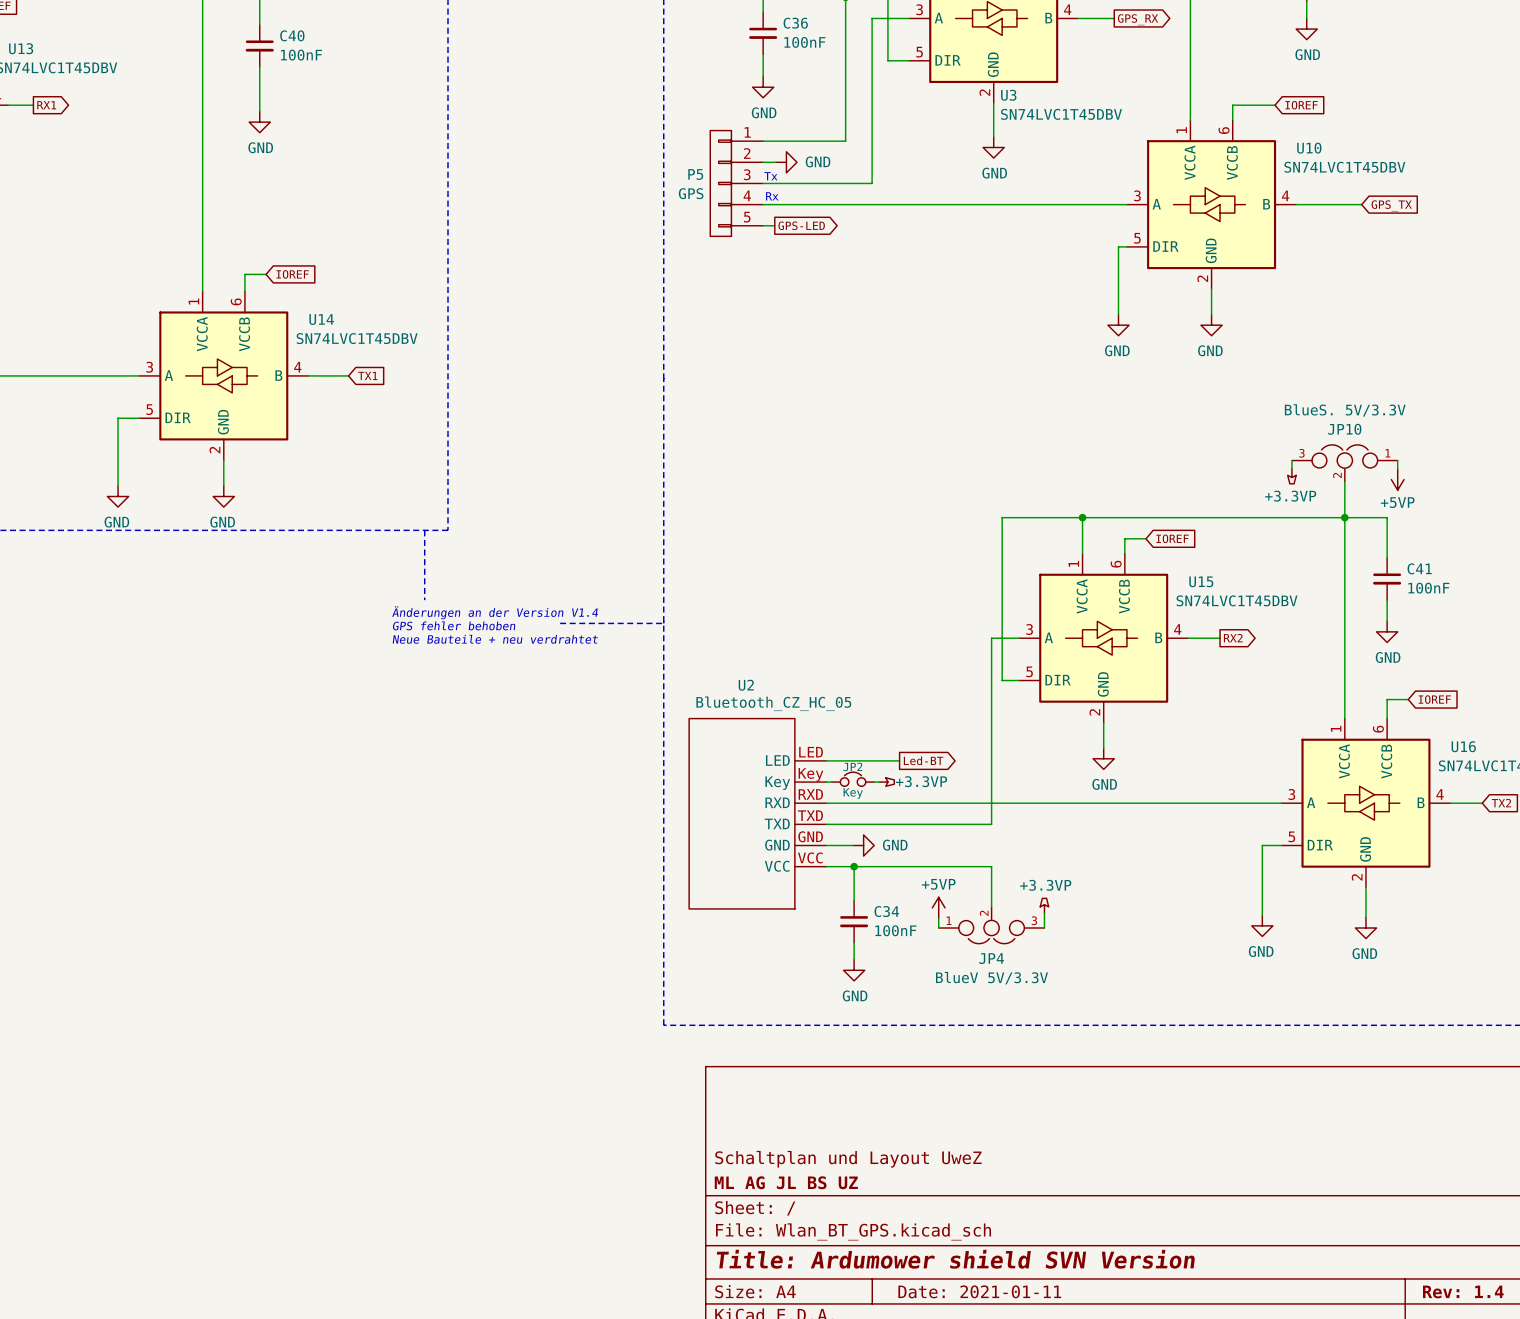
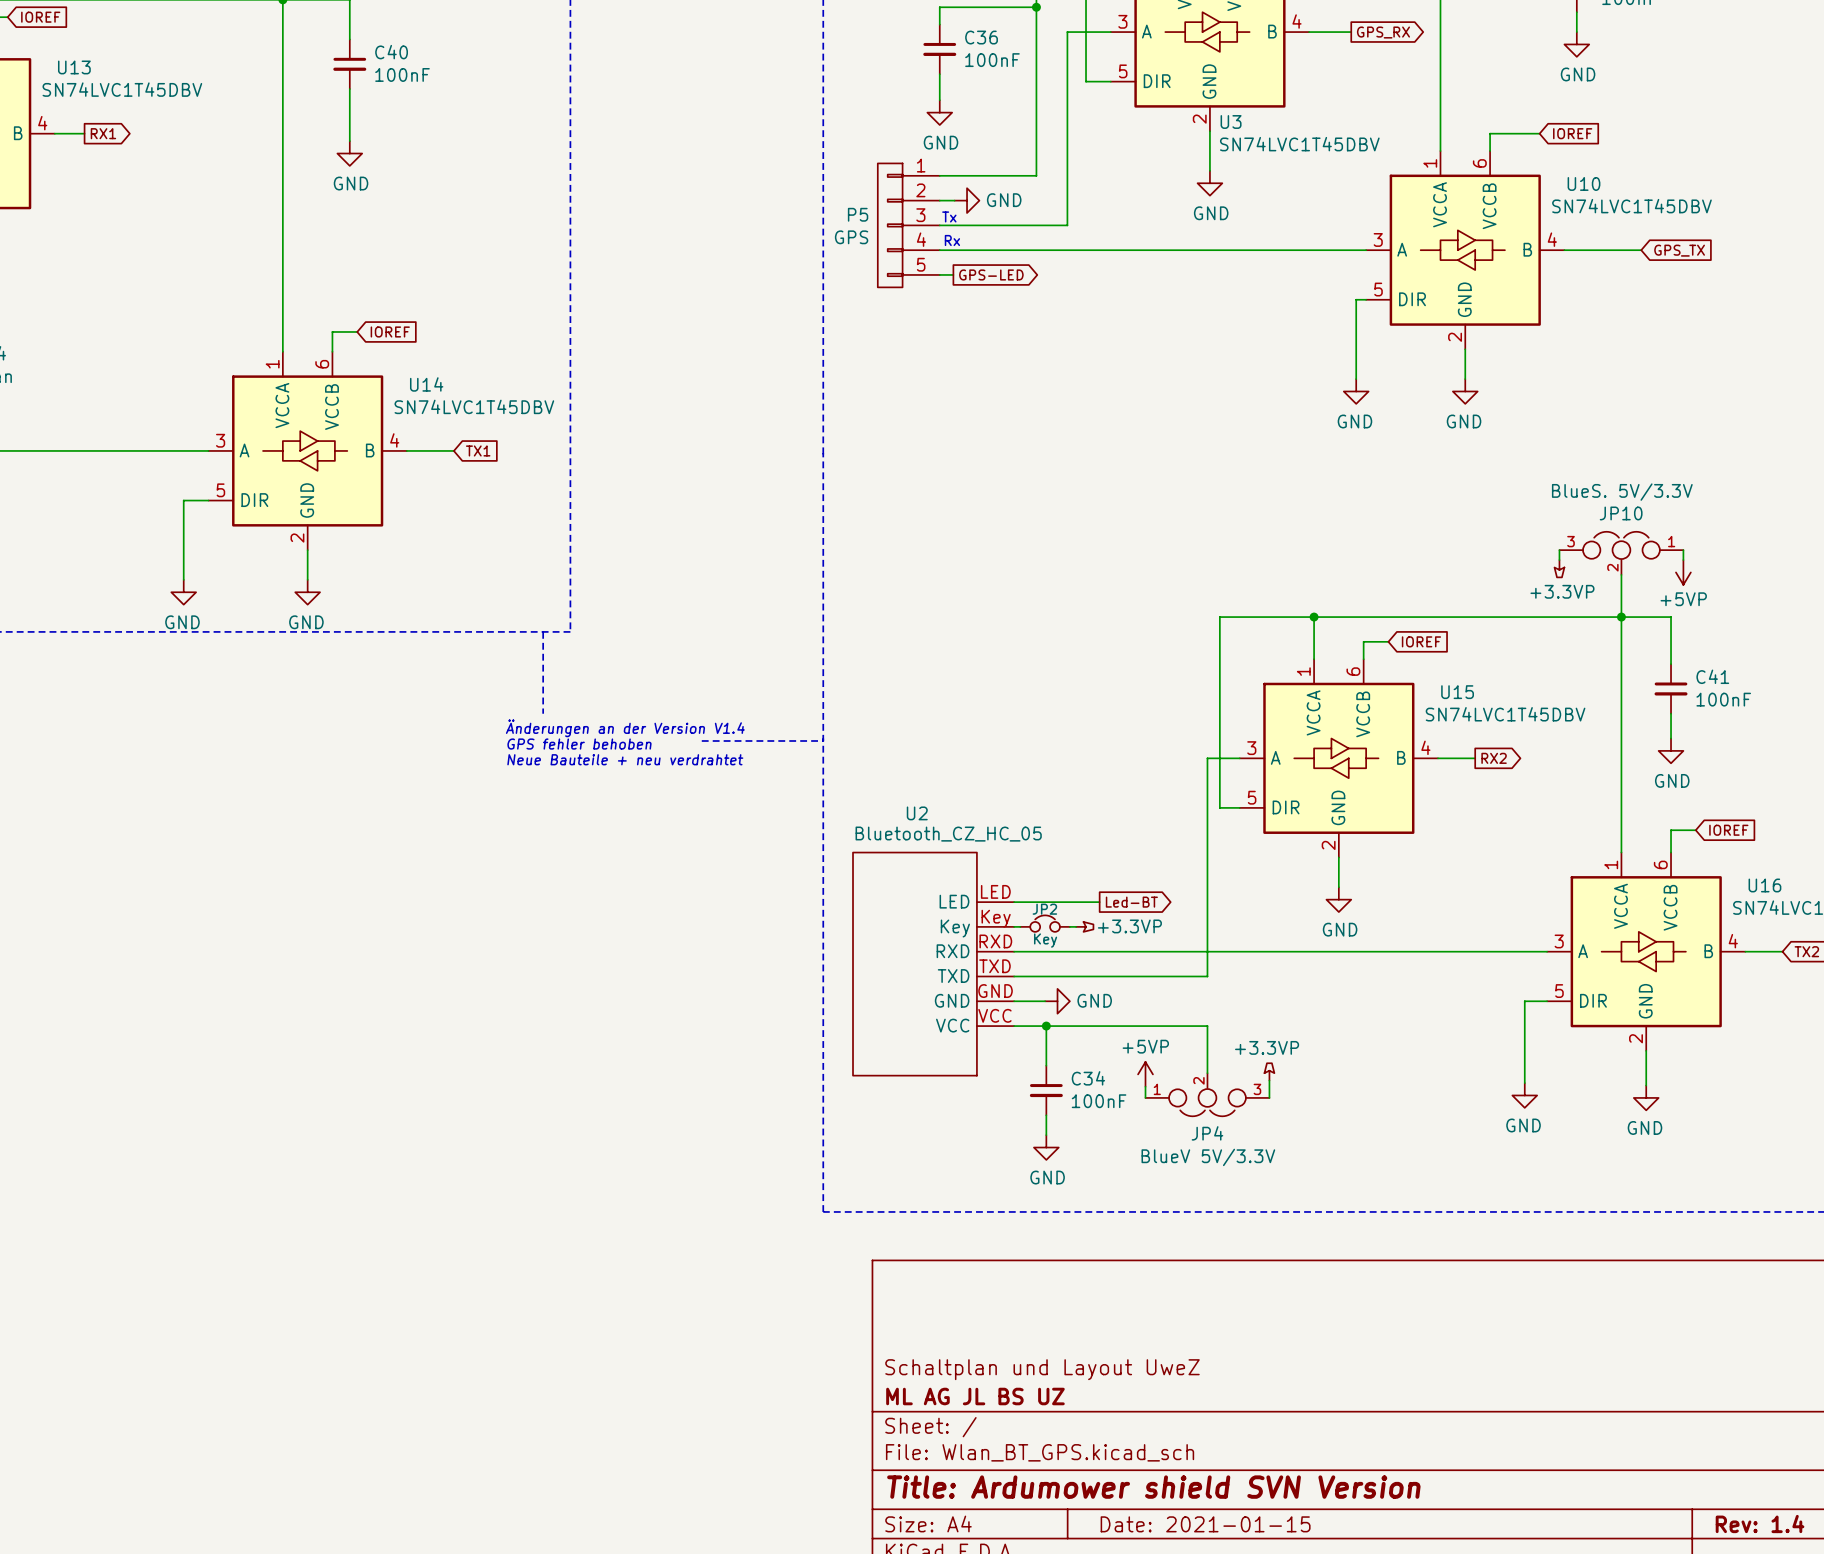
title block: Date: 2021-01-11 (979, 1291) -> Date: 2021-01-15 (1205, 1524)

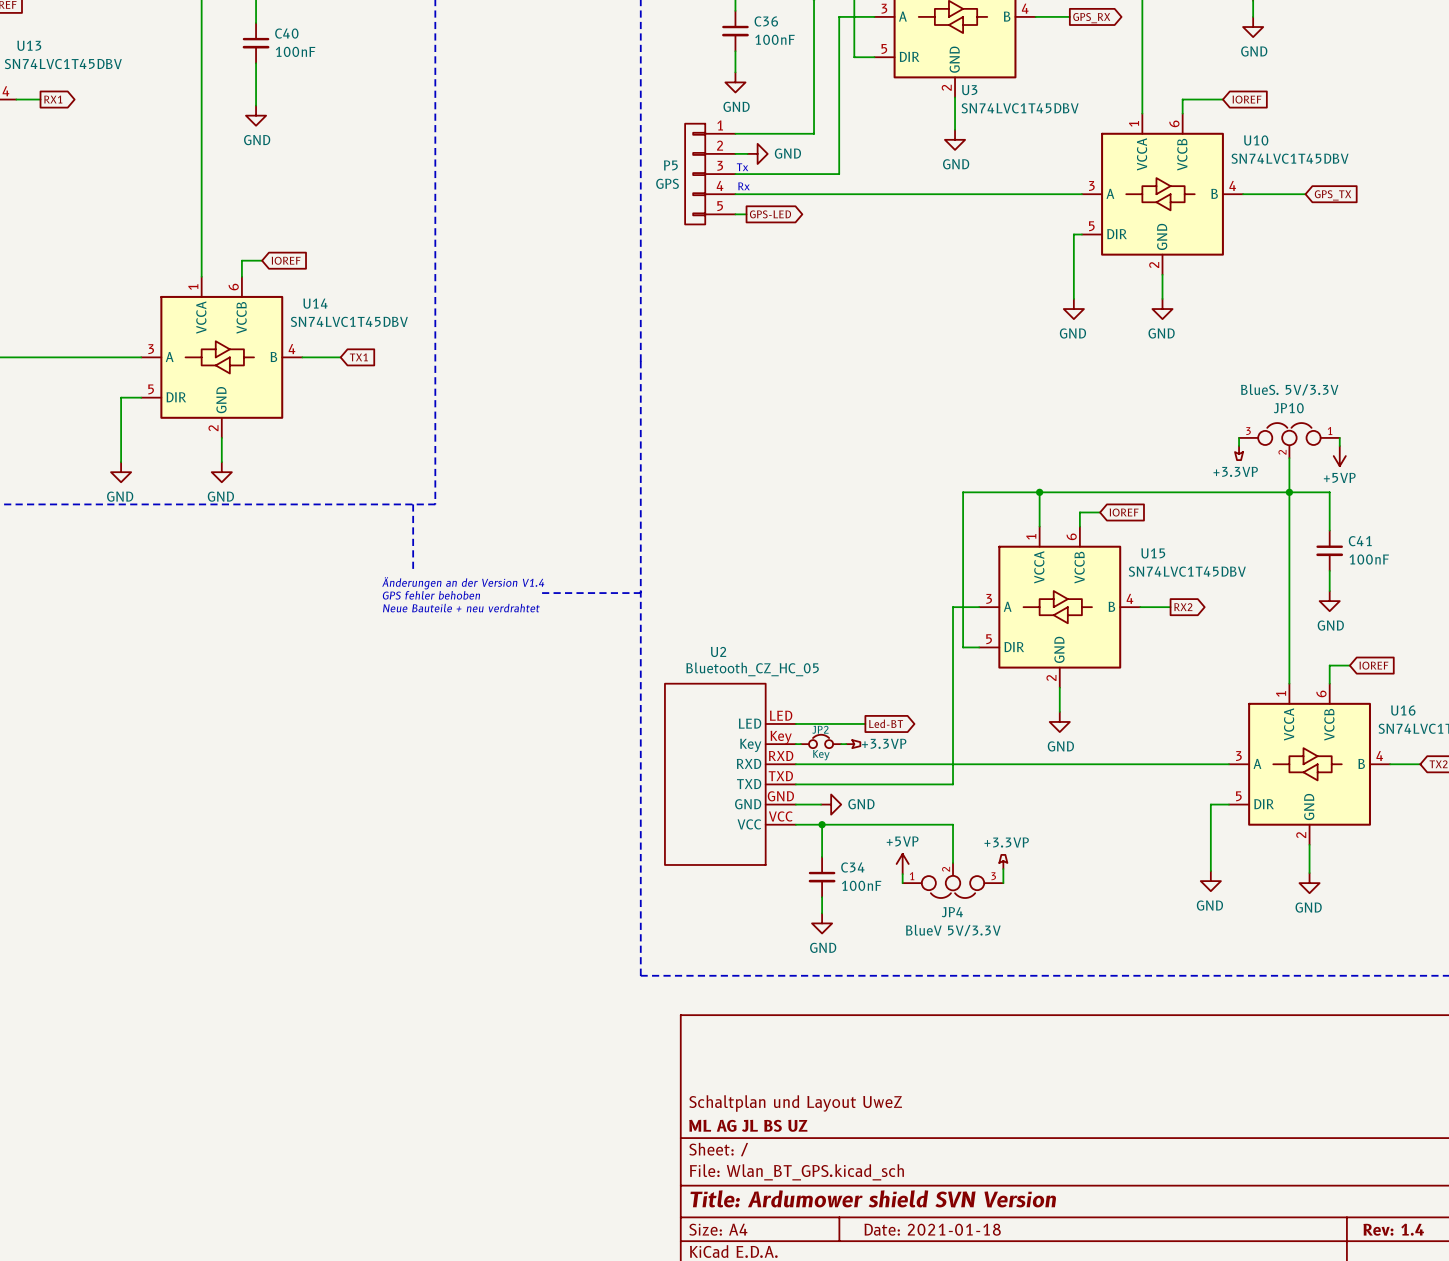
title block: Date: 2021-01-15 (1205, 1524) -> Date: 2021-01-18 (932, 1229)

